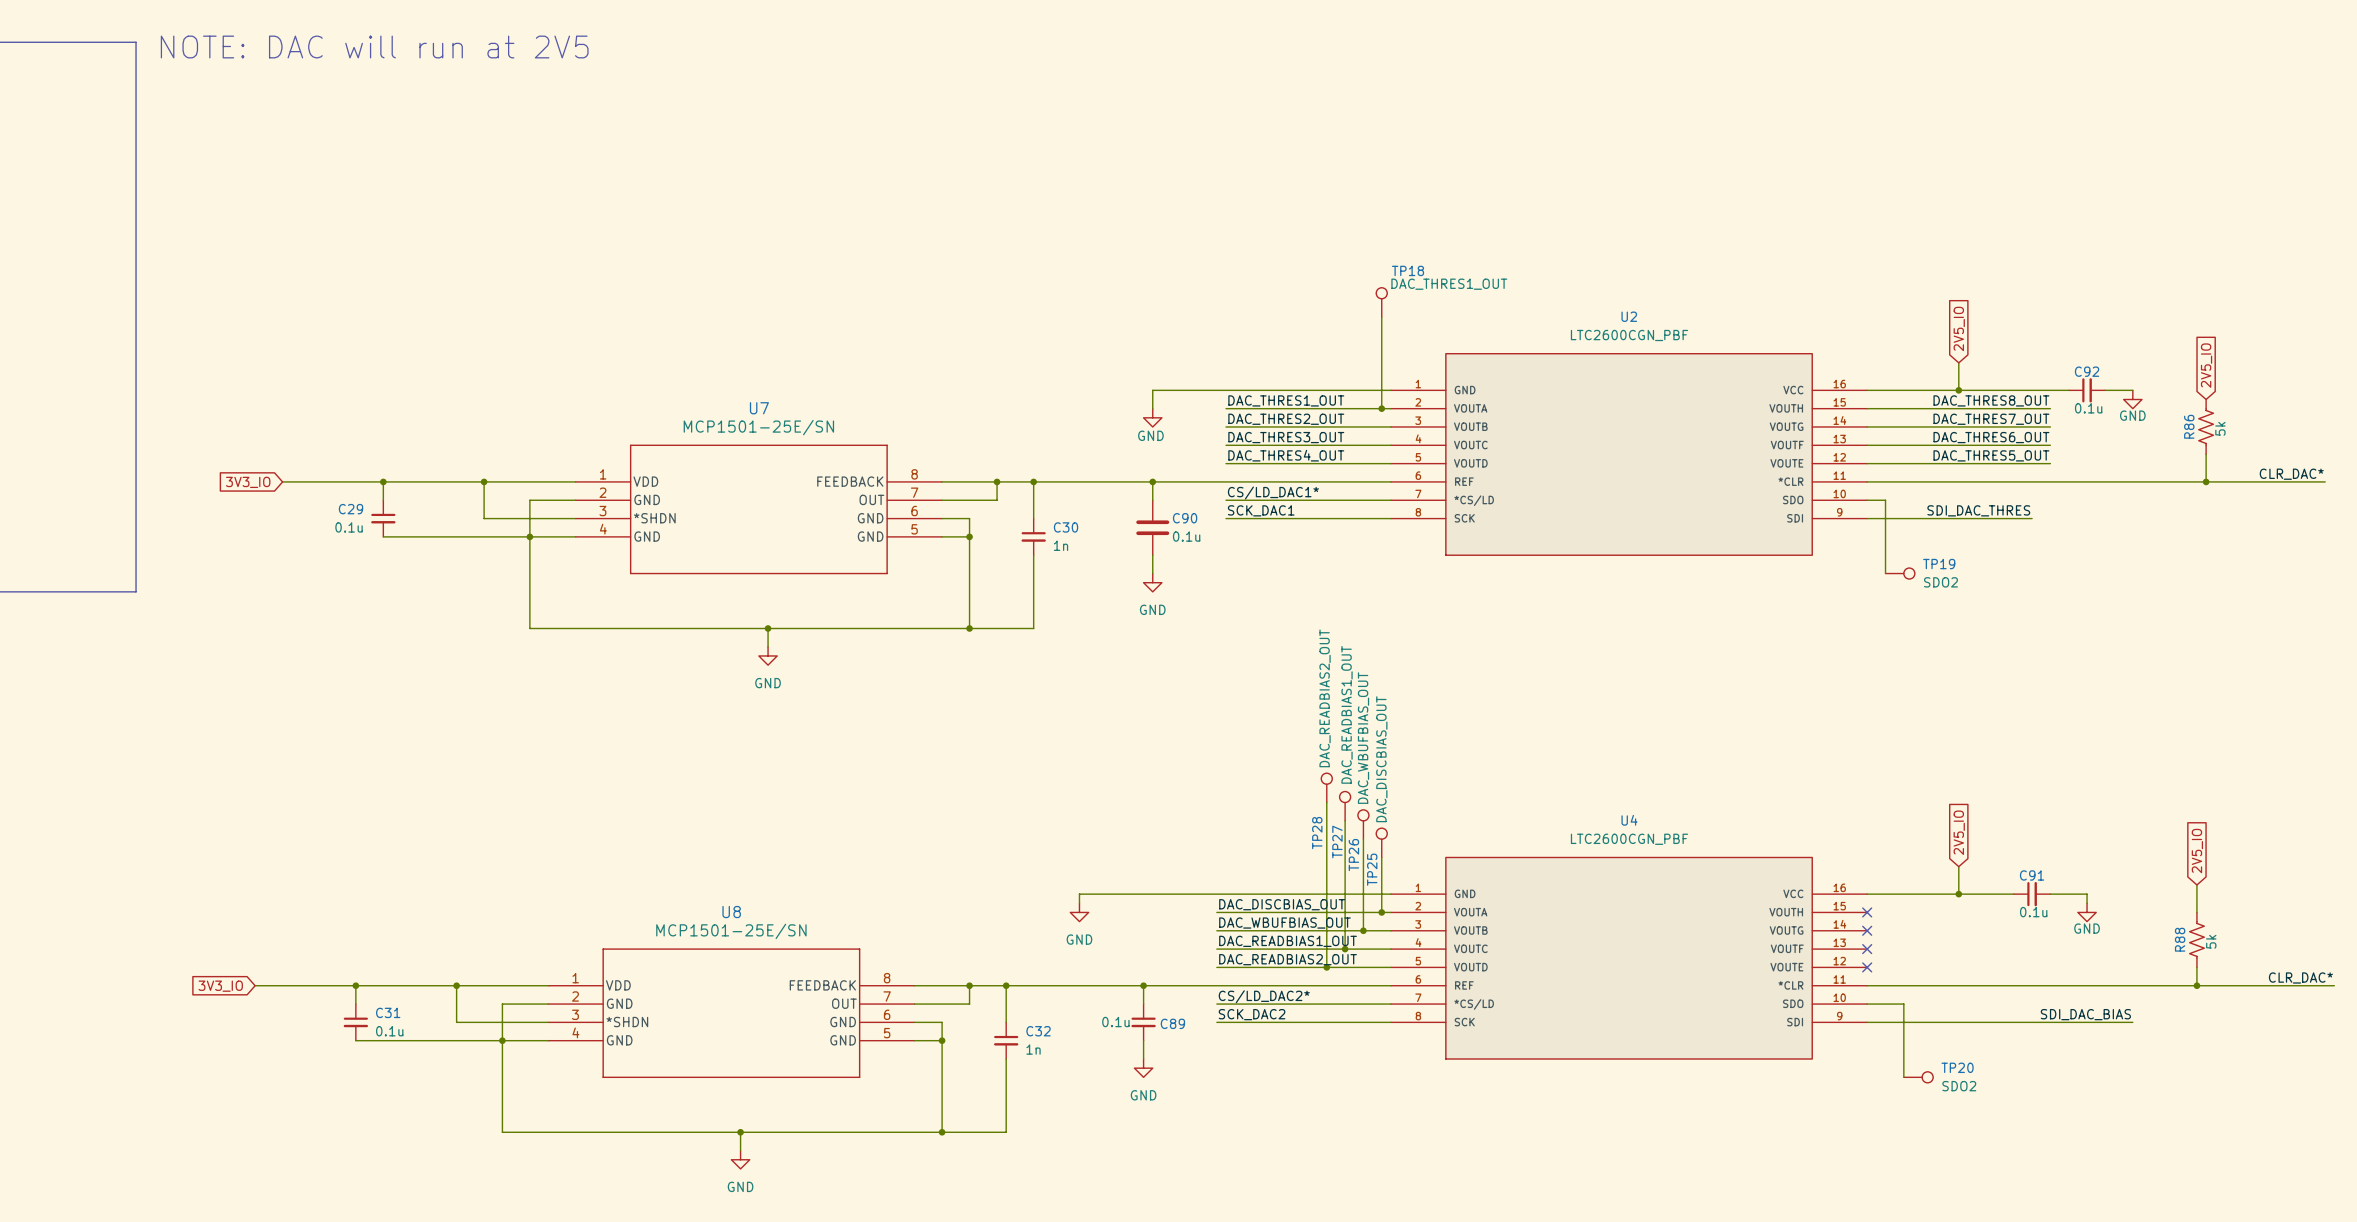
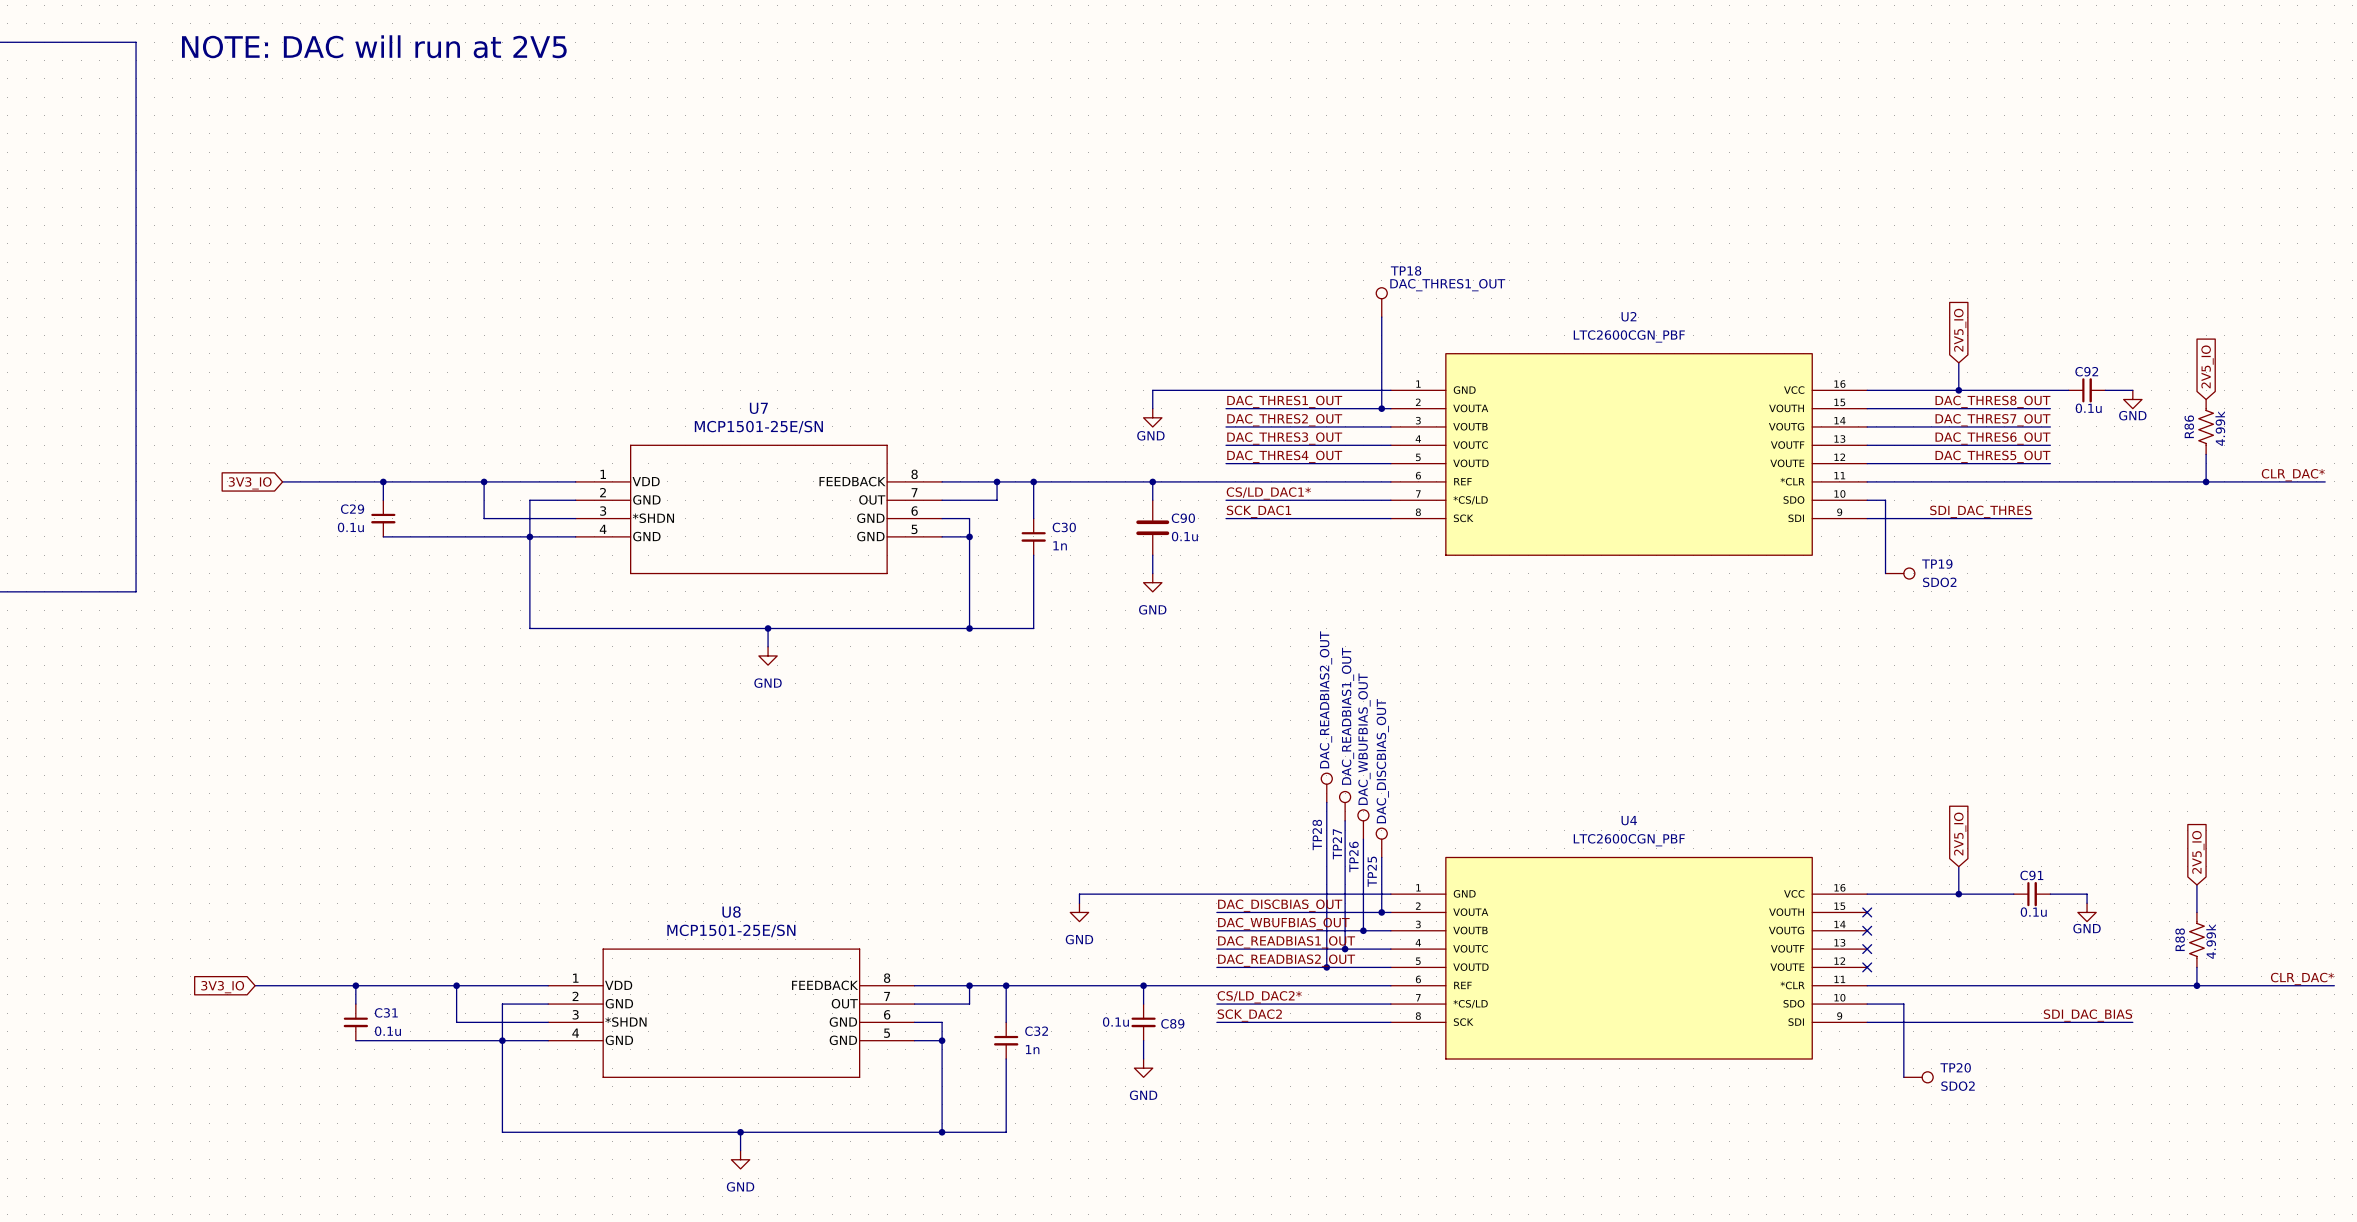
R86 value: 5k (2220, 428) -> 4.99k (2220, 428)
R88 value: 5k (2211, 941) -> 4.99k (2211, 941)

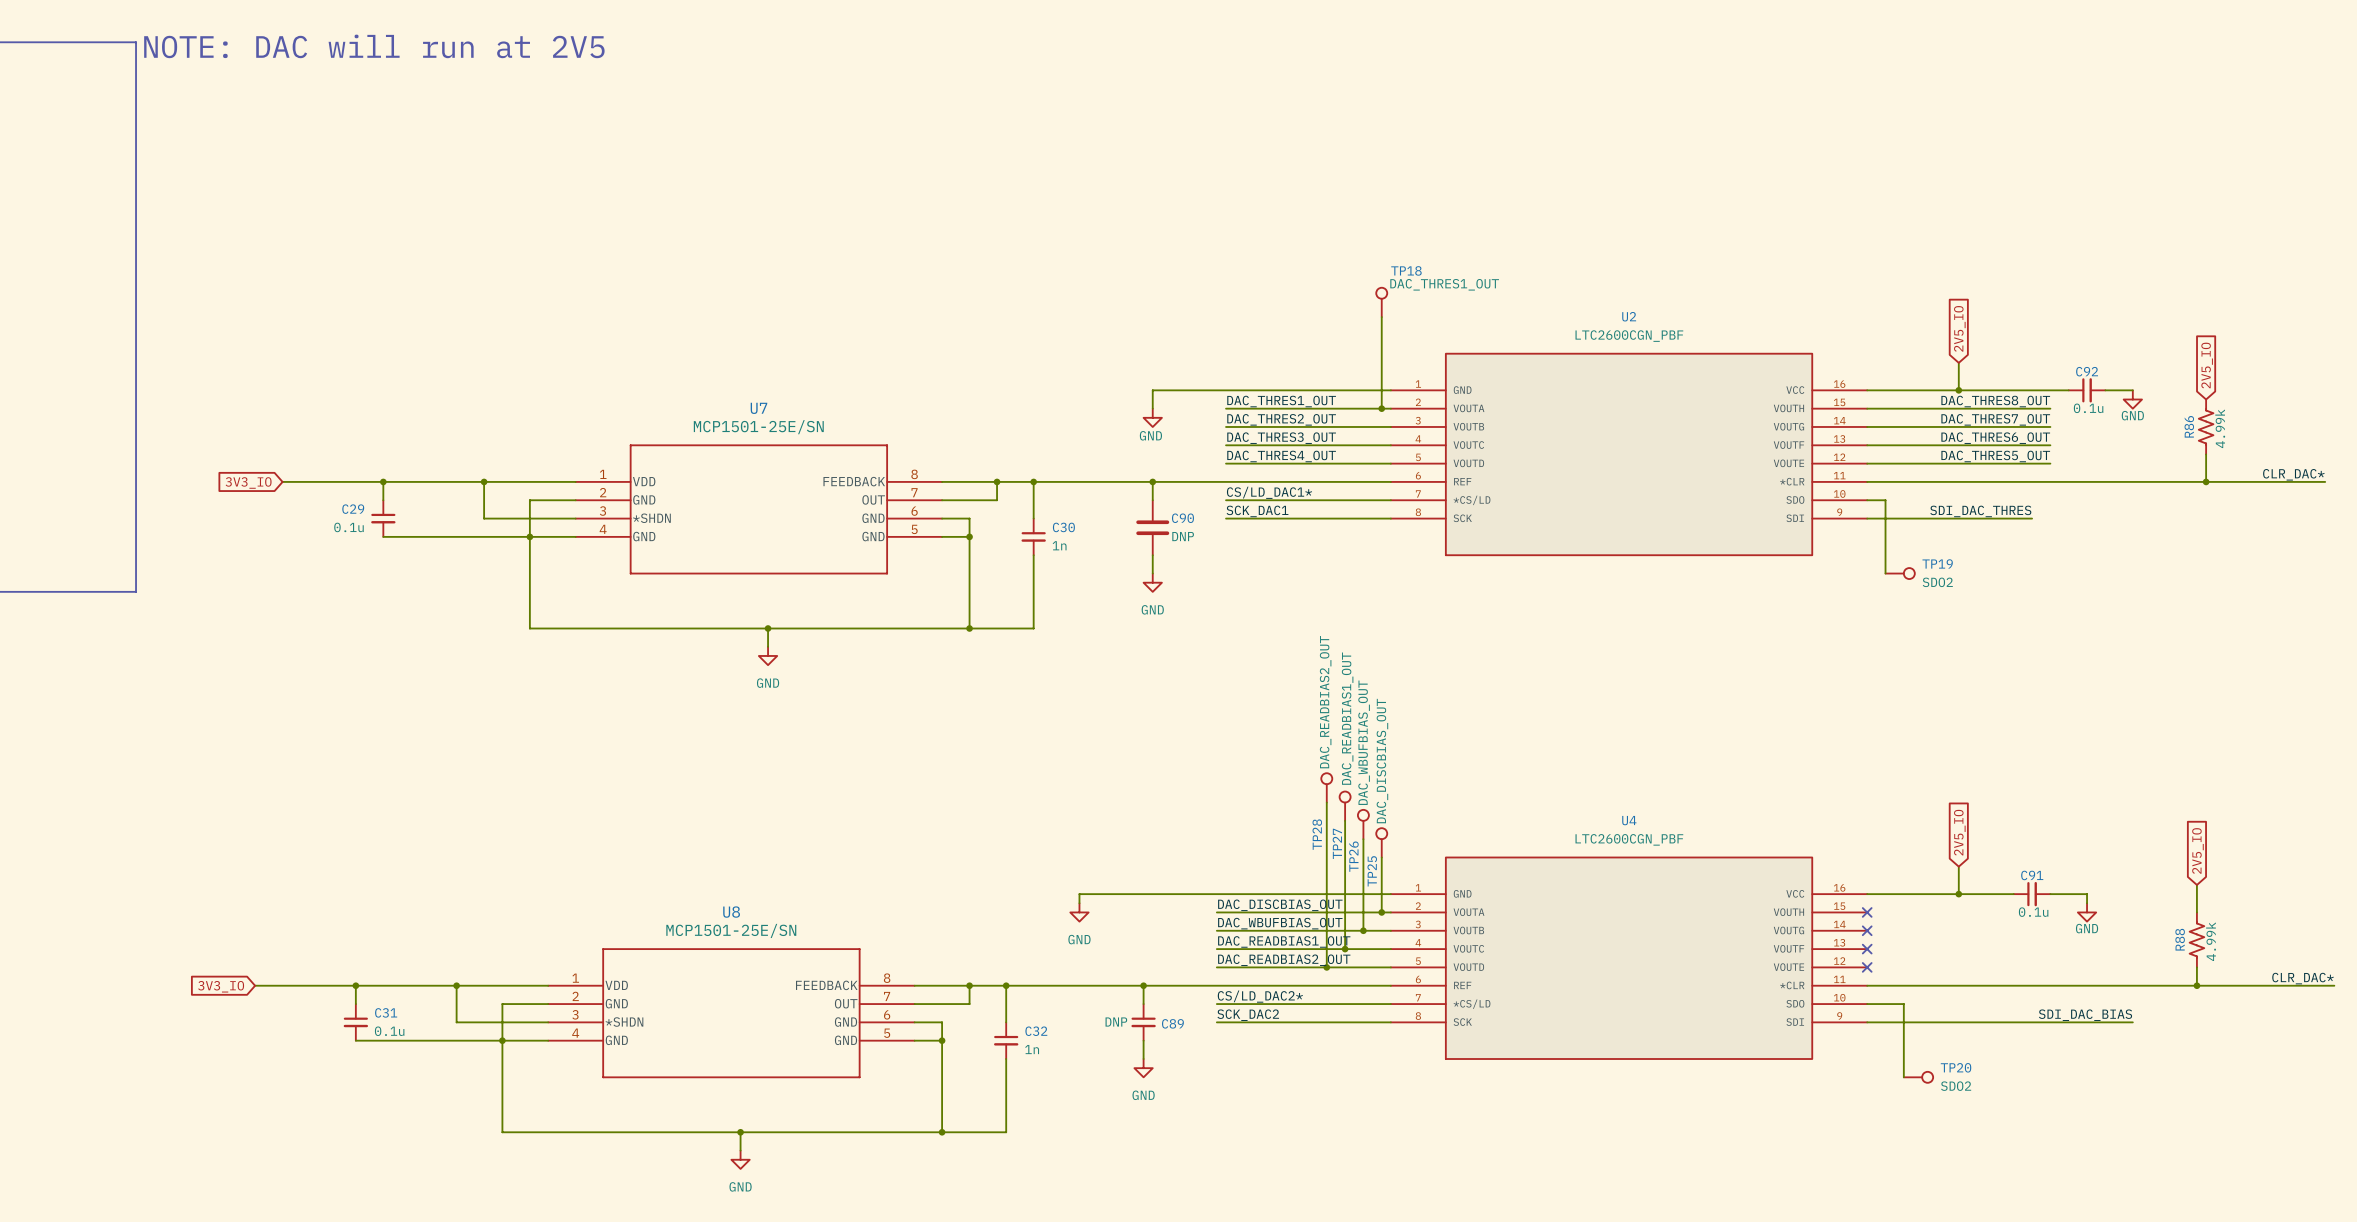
C90 value: 0.1u (1184, 536) -> DNP (1183, 536)
C89 value: 0.1u (1115, 1022) -> DNP (1116, 1022)

